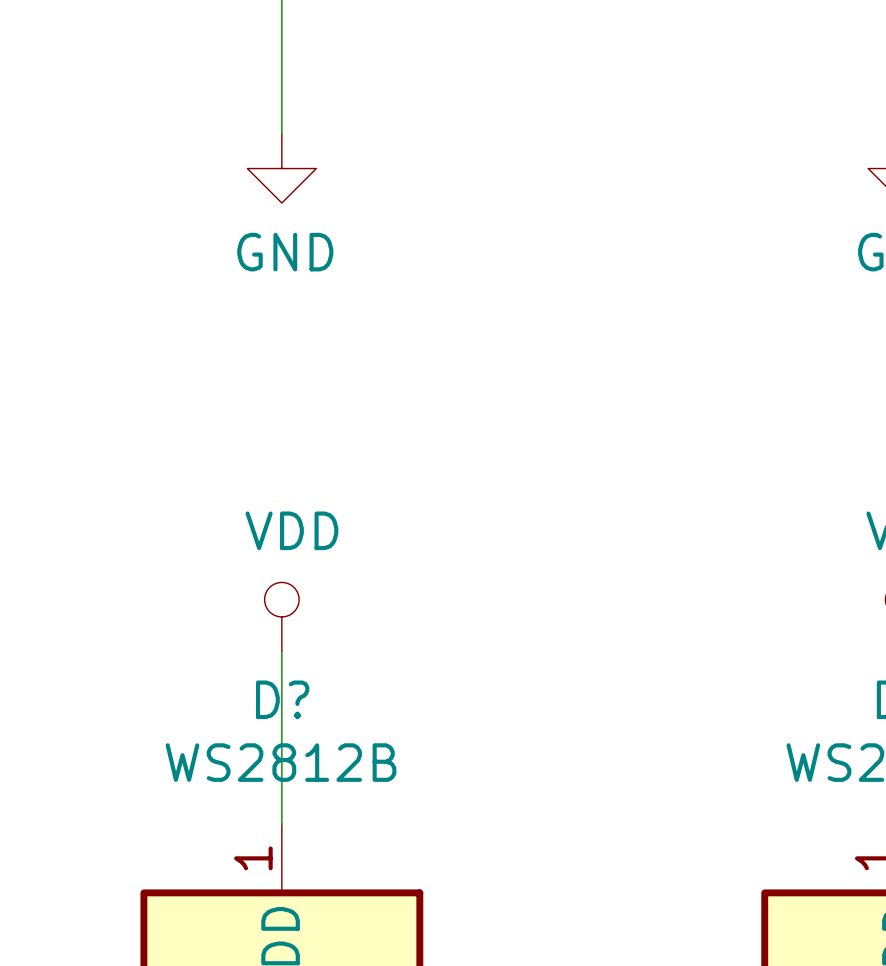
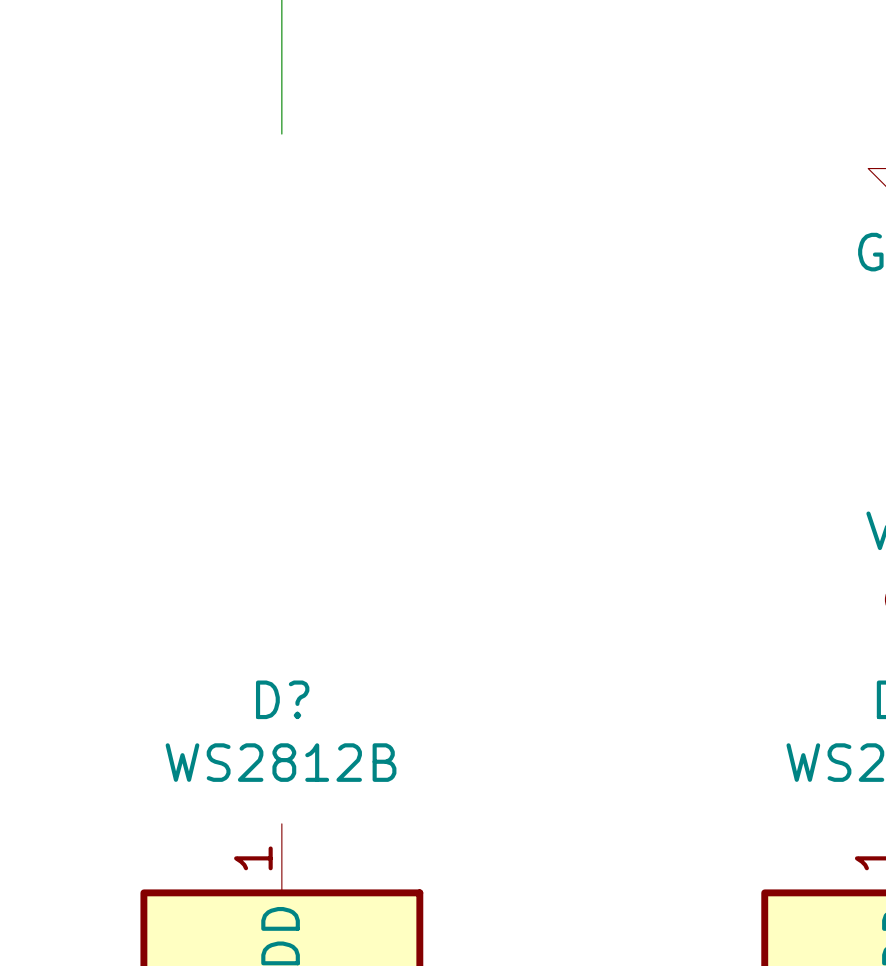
power symbol: GND (281, 168) -> none
power symbol: VDD (281, 616) -> none
wire: (281, 651) (281, 823) -> none

